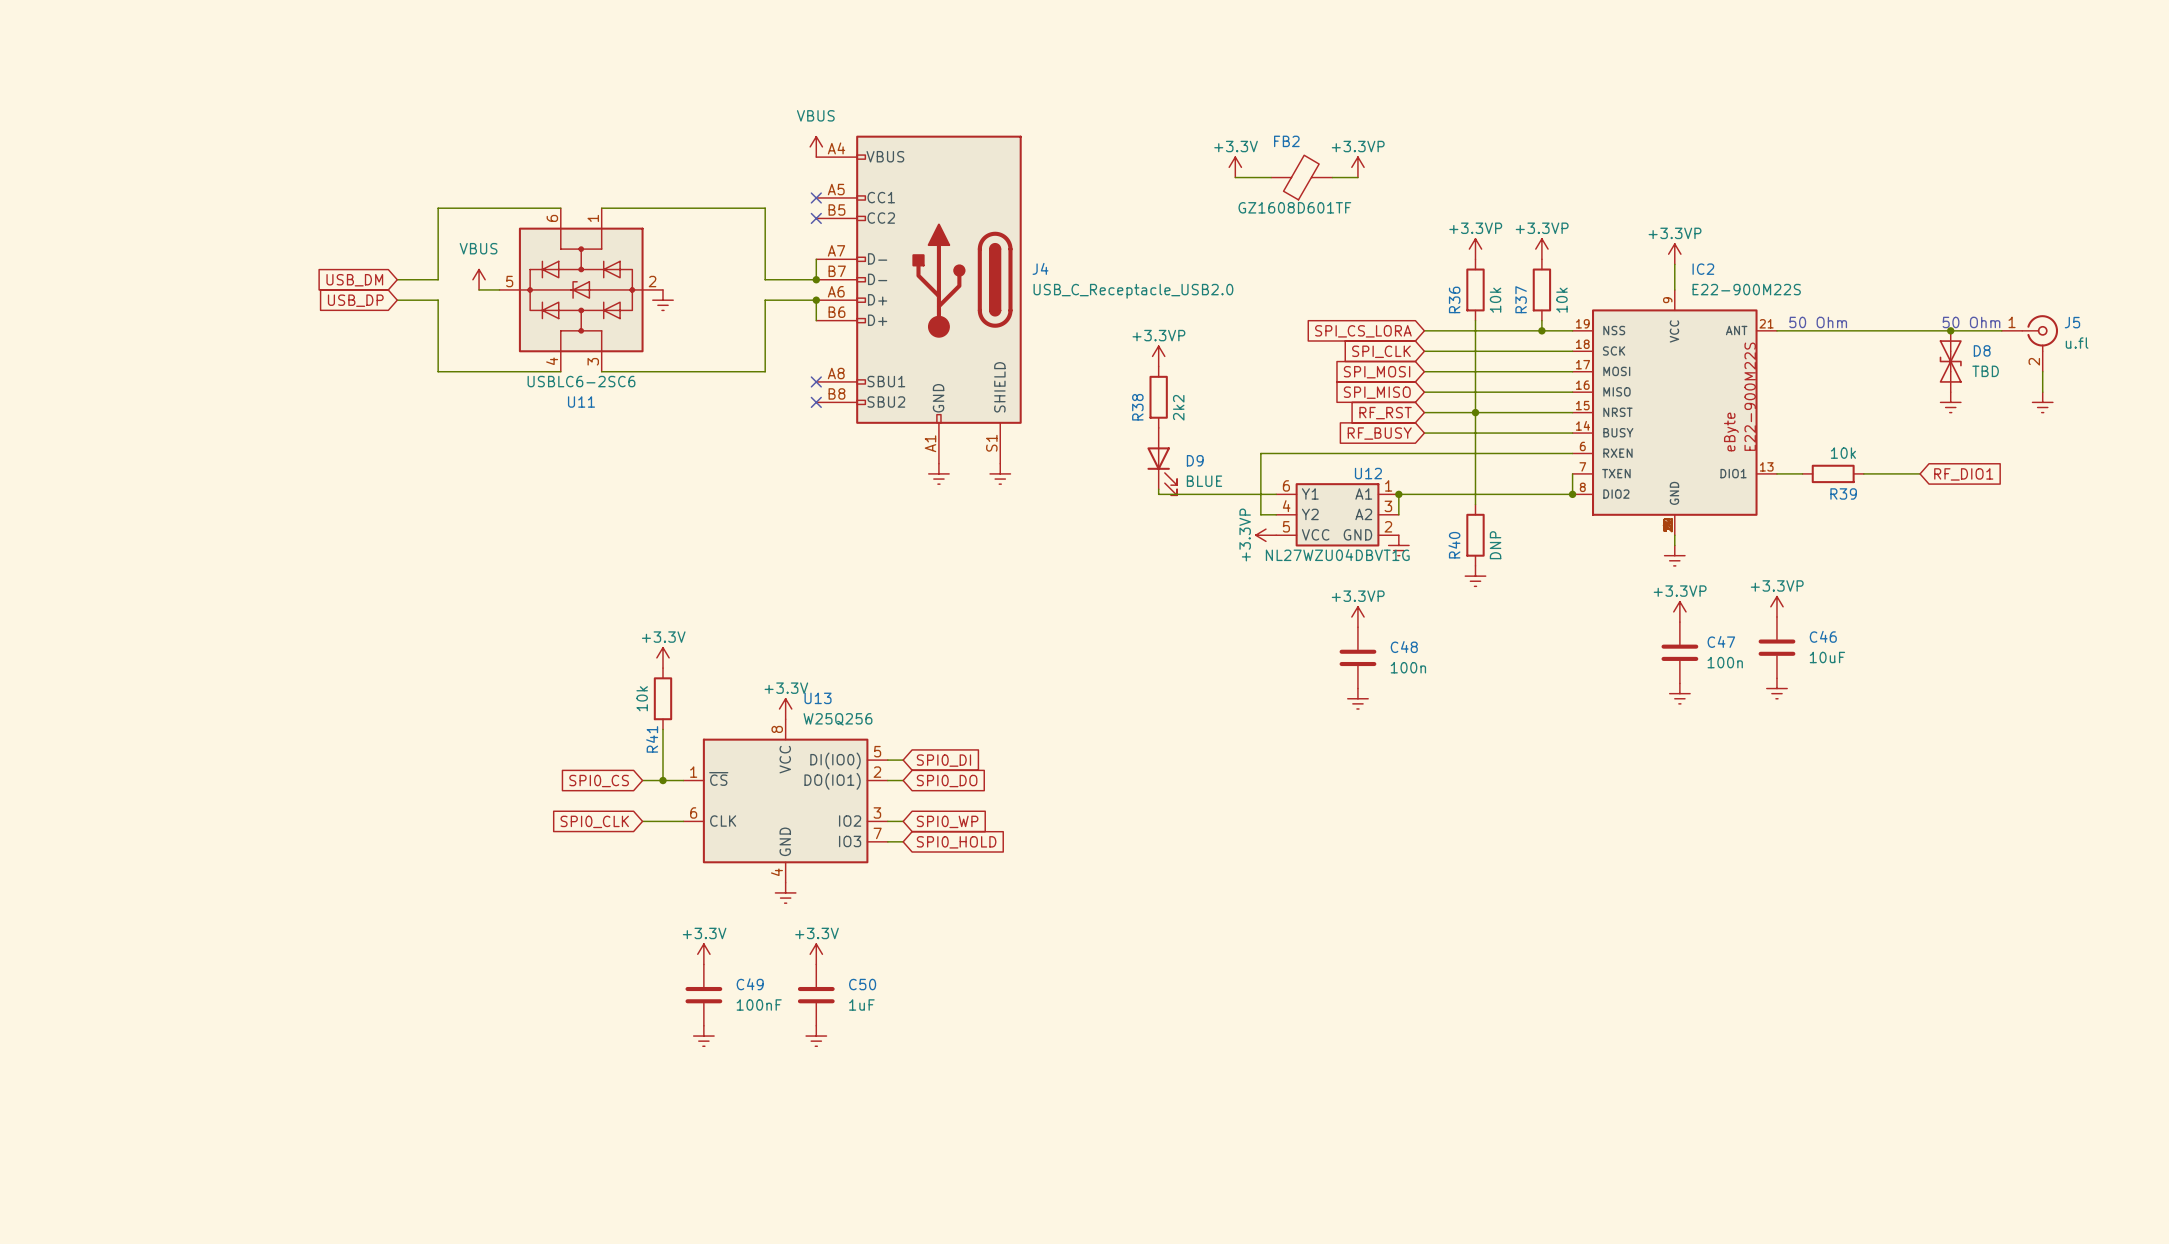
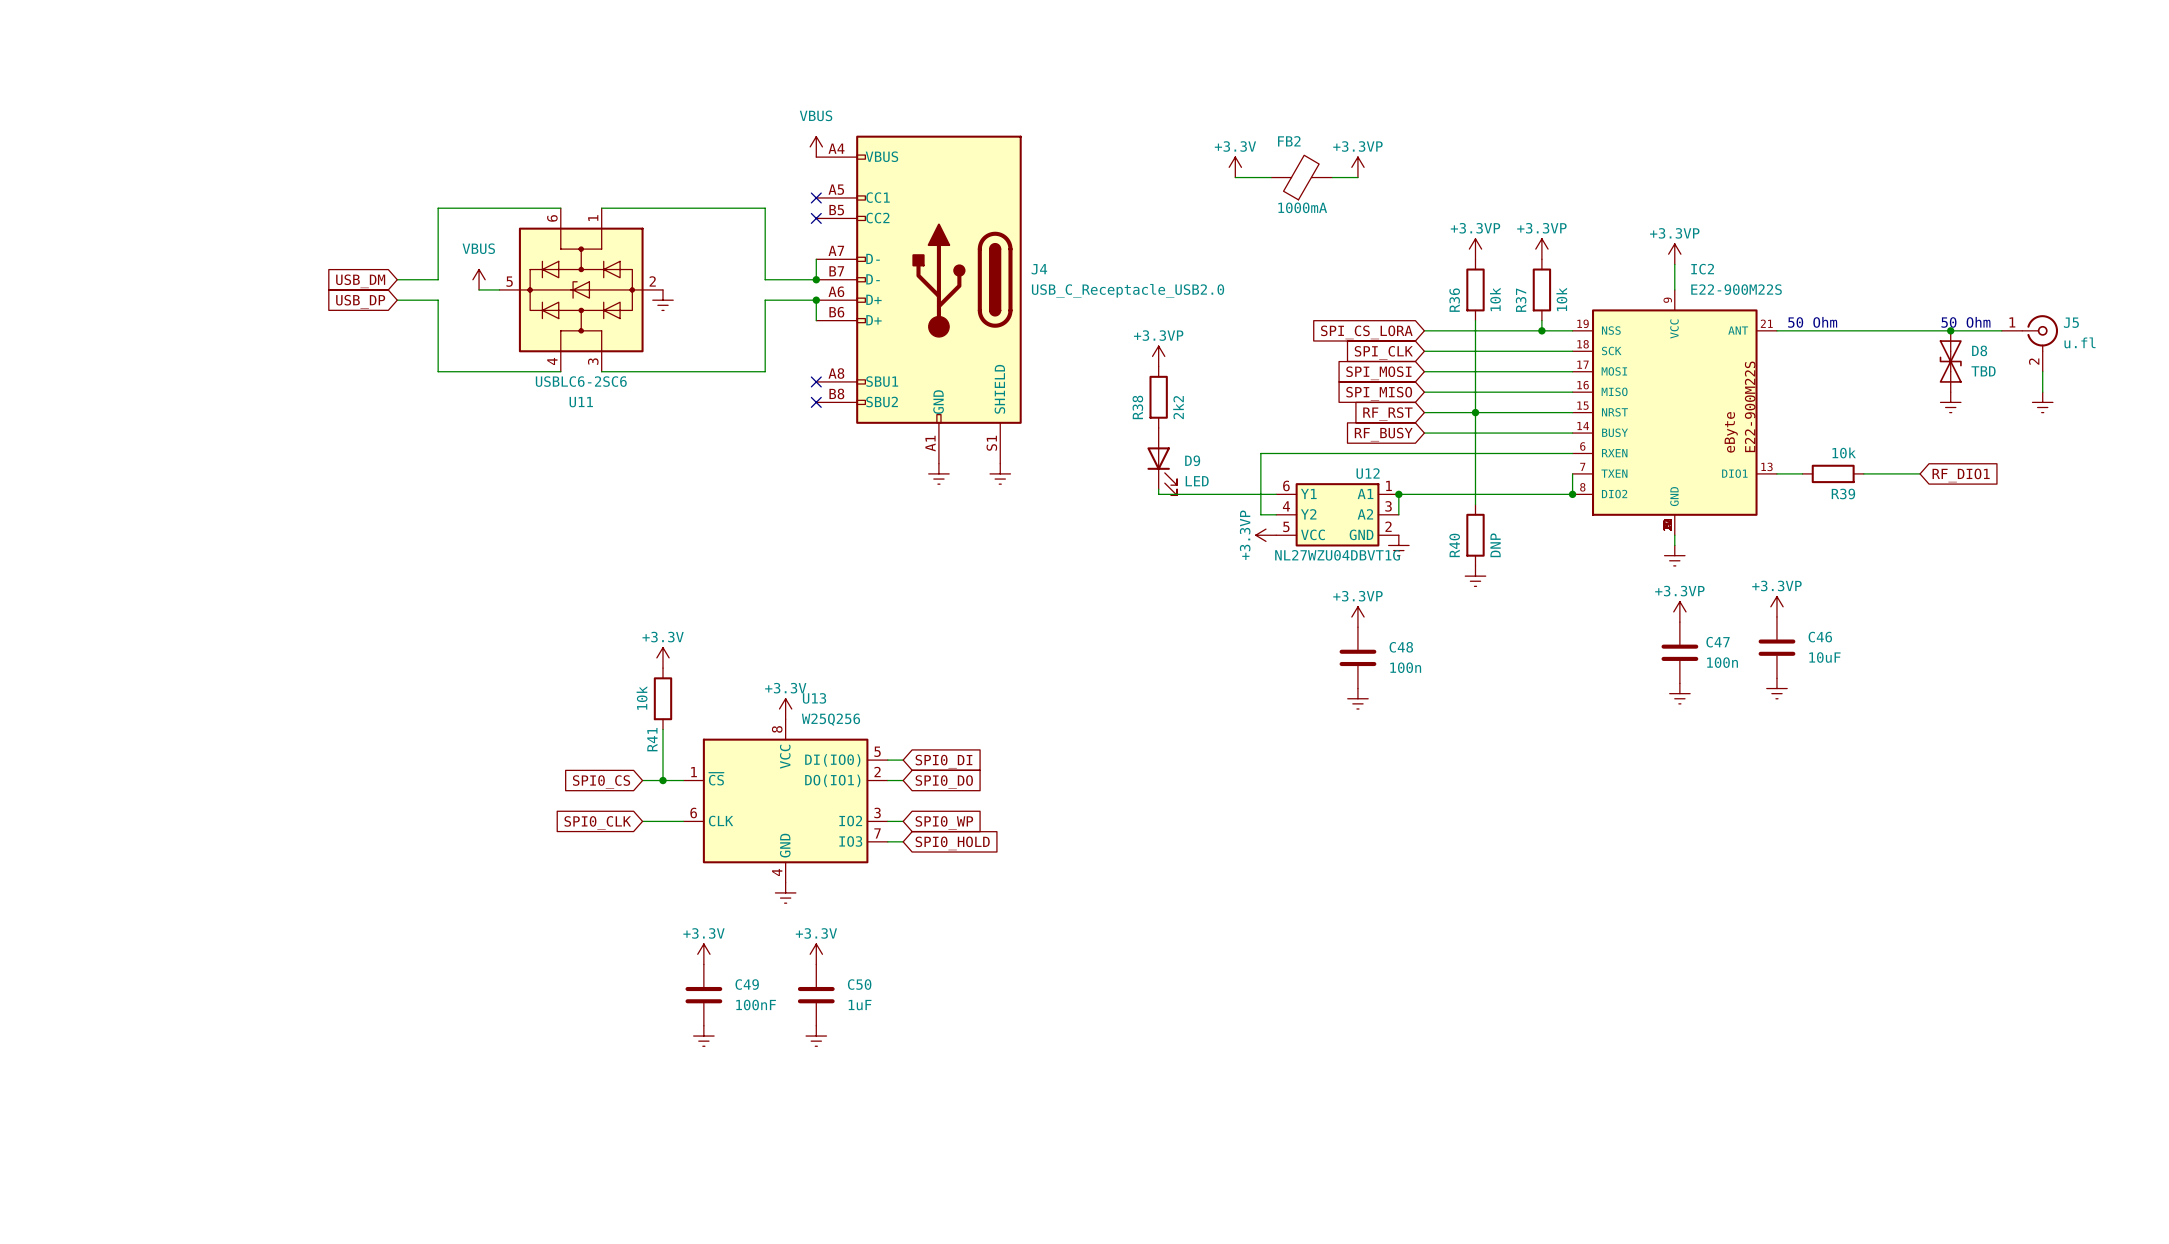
FB2 value: GZ1608D601TF (1294, 207) -> 1000mA (1302, 207)
D9 value: BLUE (1204, 481) -> LED (1197, 481)

